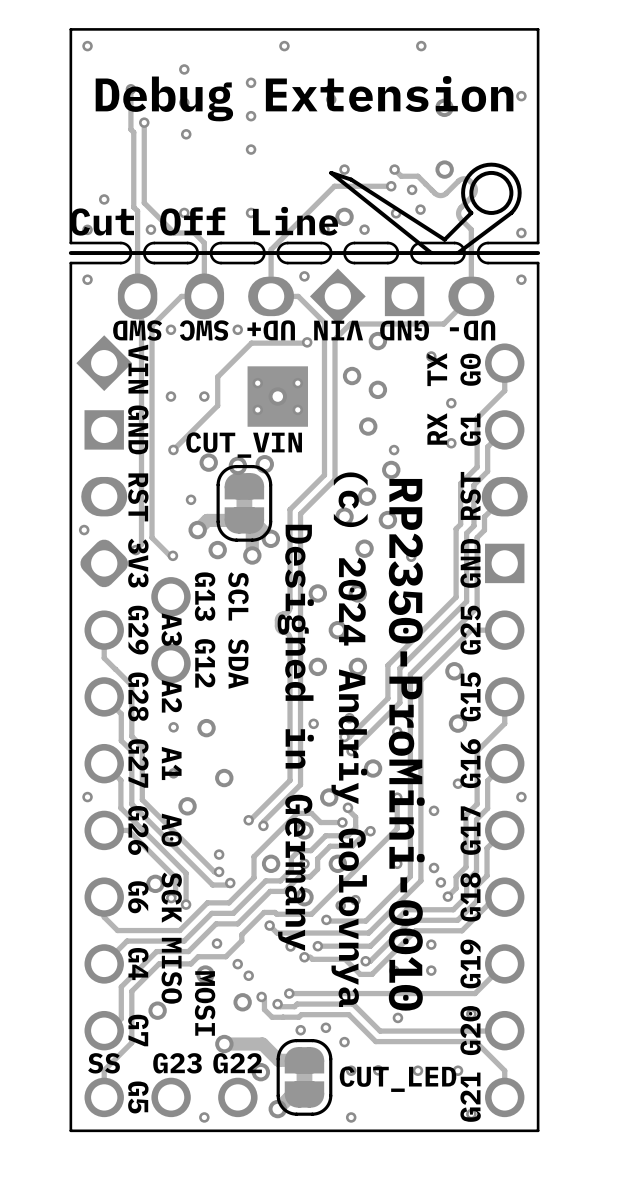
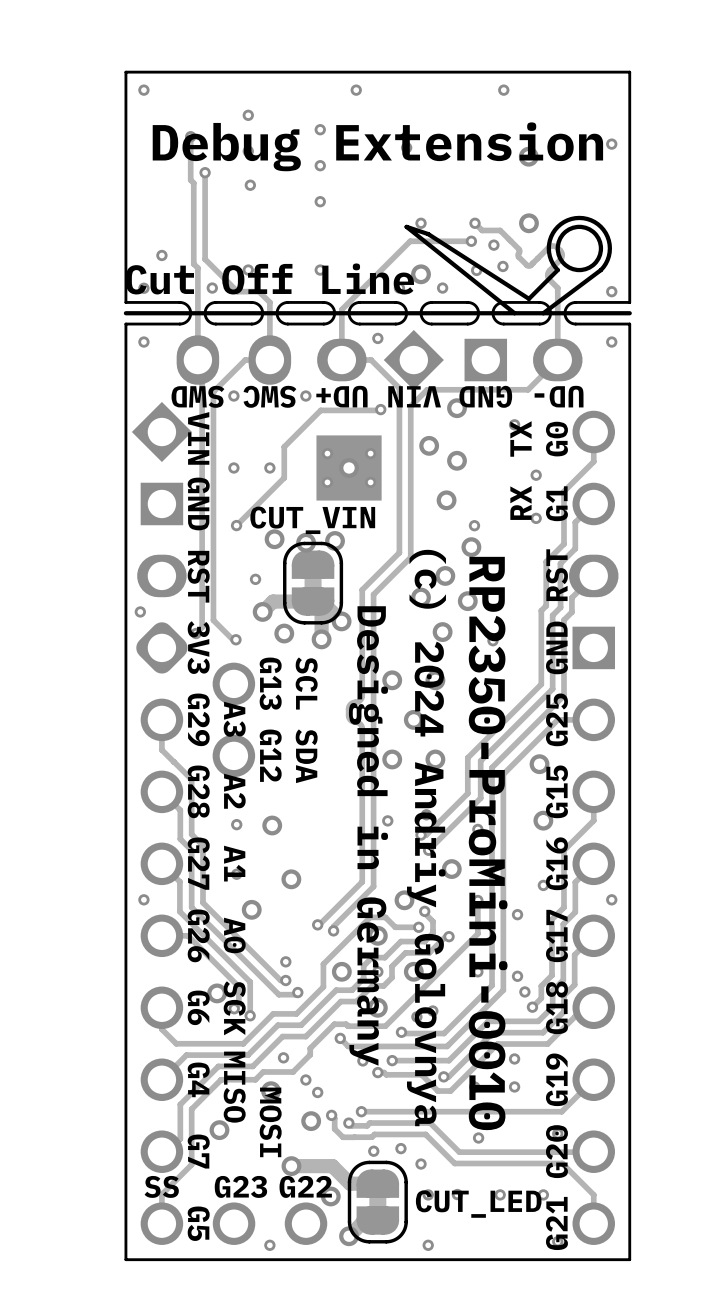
track: (434, 193) (439, 195) (444, 194) (462, 178) (467, 179) (472, 184) (475, 188) (474, 193) (458, 211) (459, 217) (463, 222) -> (518, 248) (518, 256) (528, 266) (549, 246) (554, 246) (560, 250) (561, 258) (548, 272) (549, 280)

